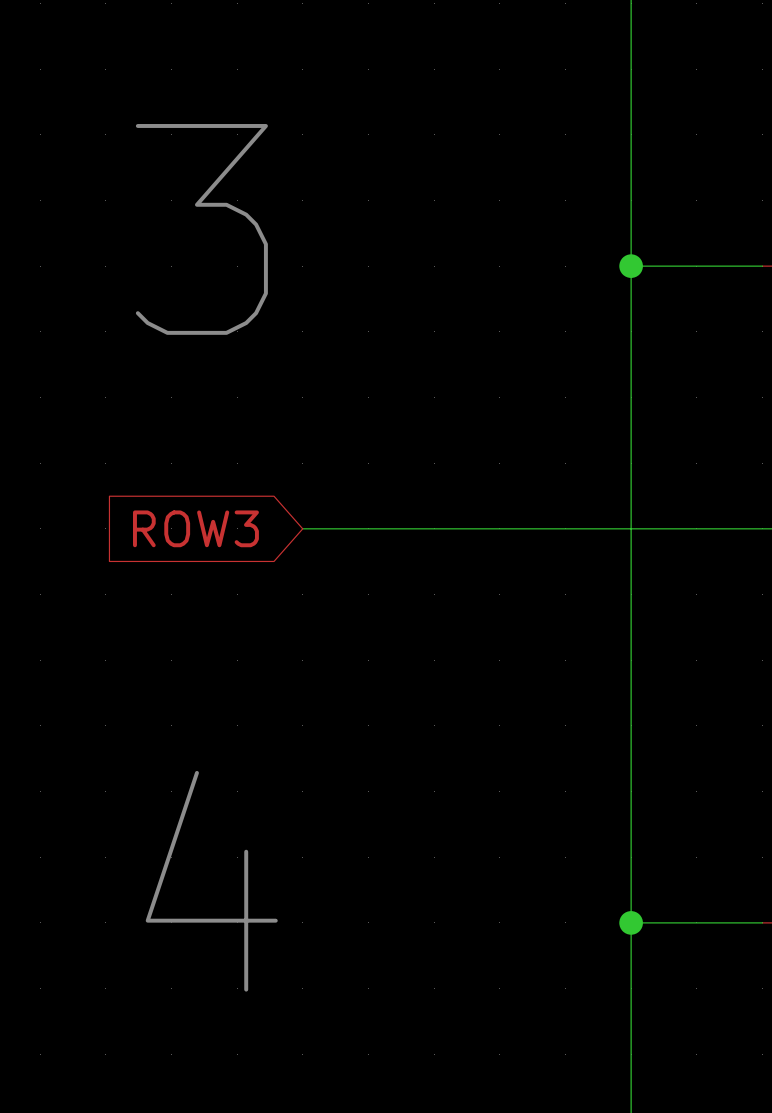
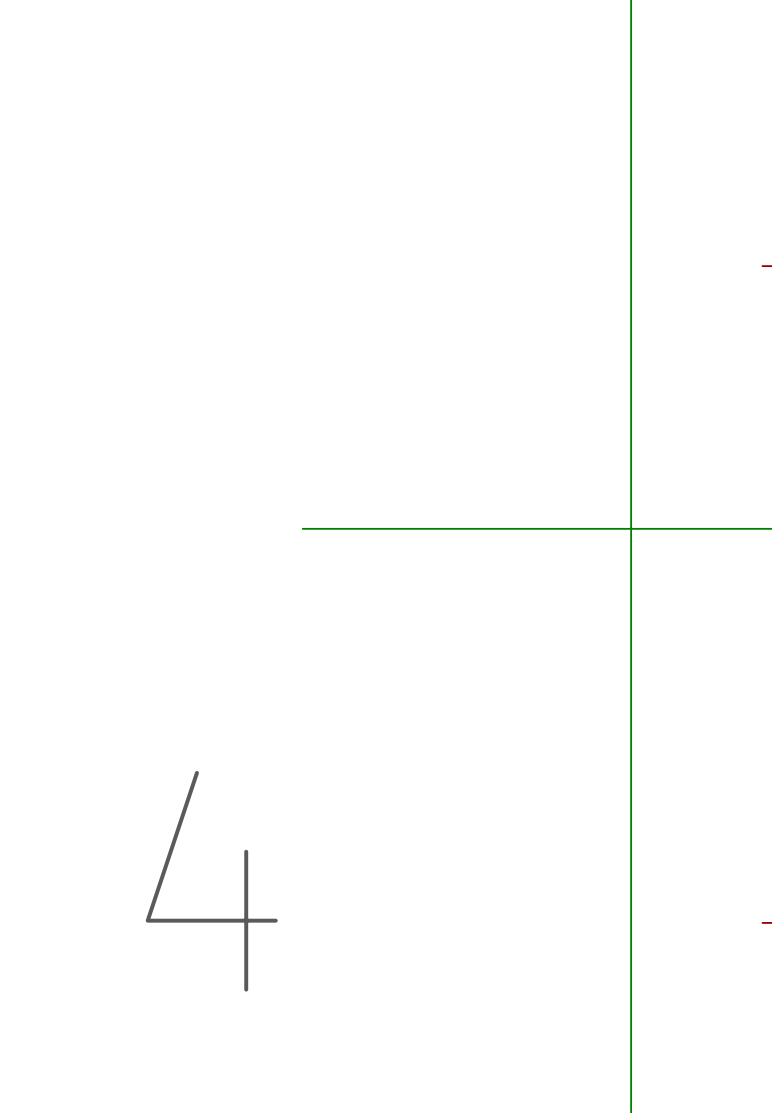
text: 3 (201, 229) -> none
wire: (631, 266) (762, 266) -> none
junction: (631, 266) -> none
global label: ROW3 (195, 528) -> none
wire: (631, 922) (762, 922) -> none
junction: (631, 922) -> none

